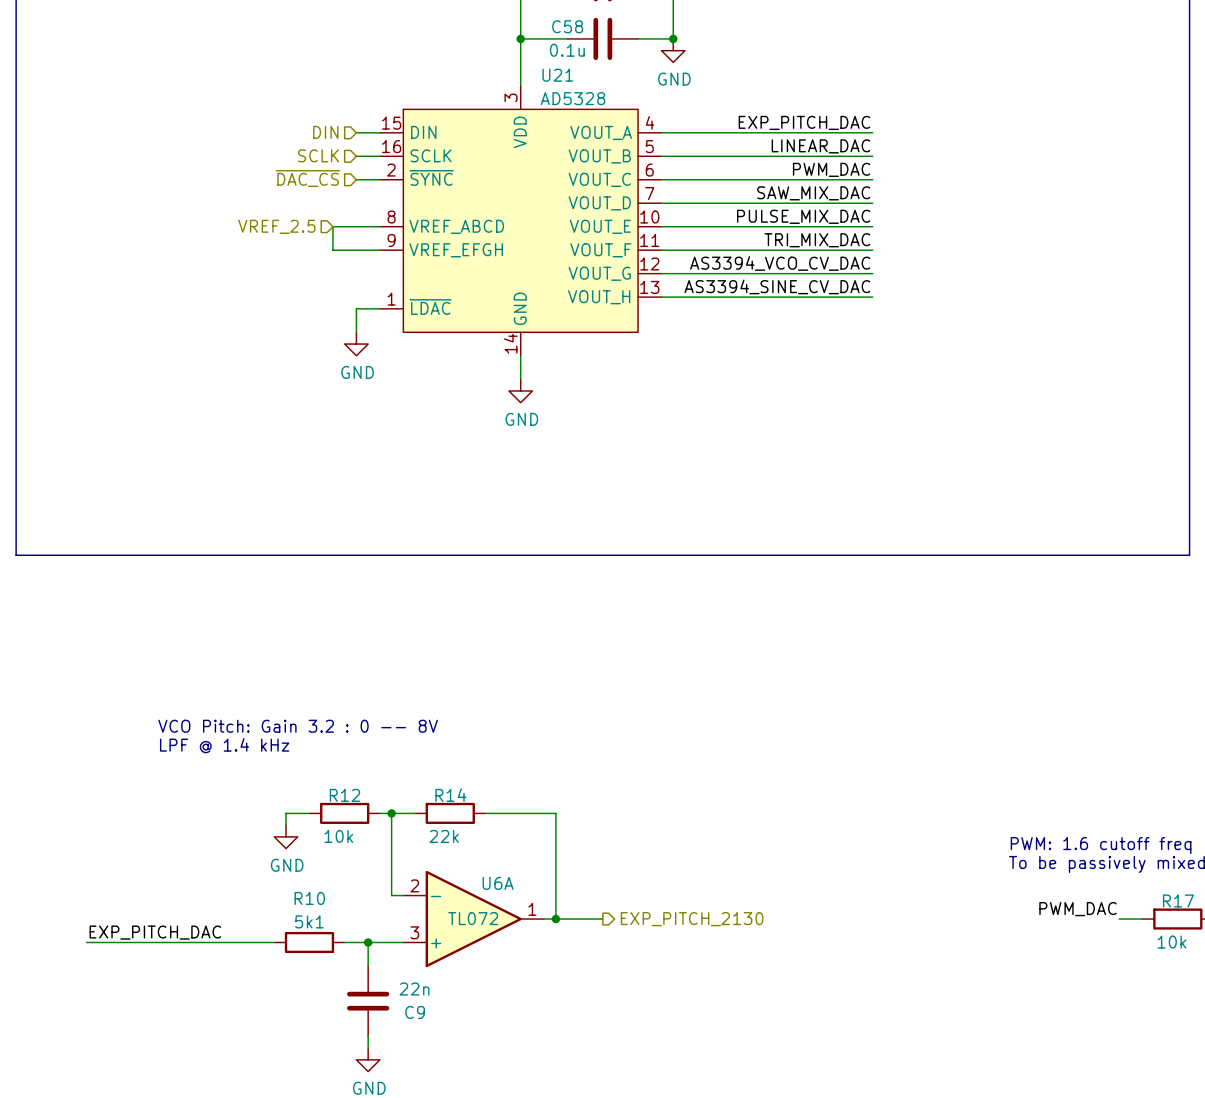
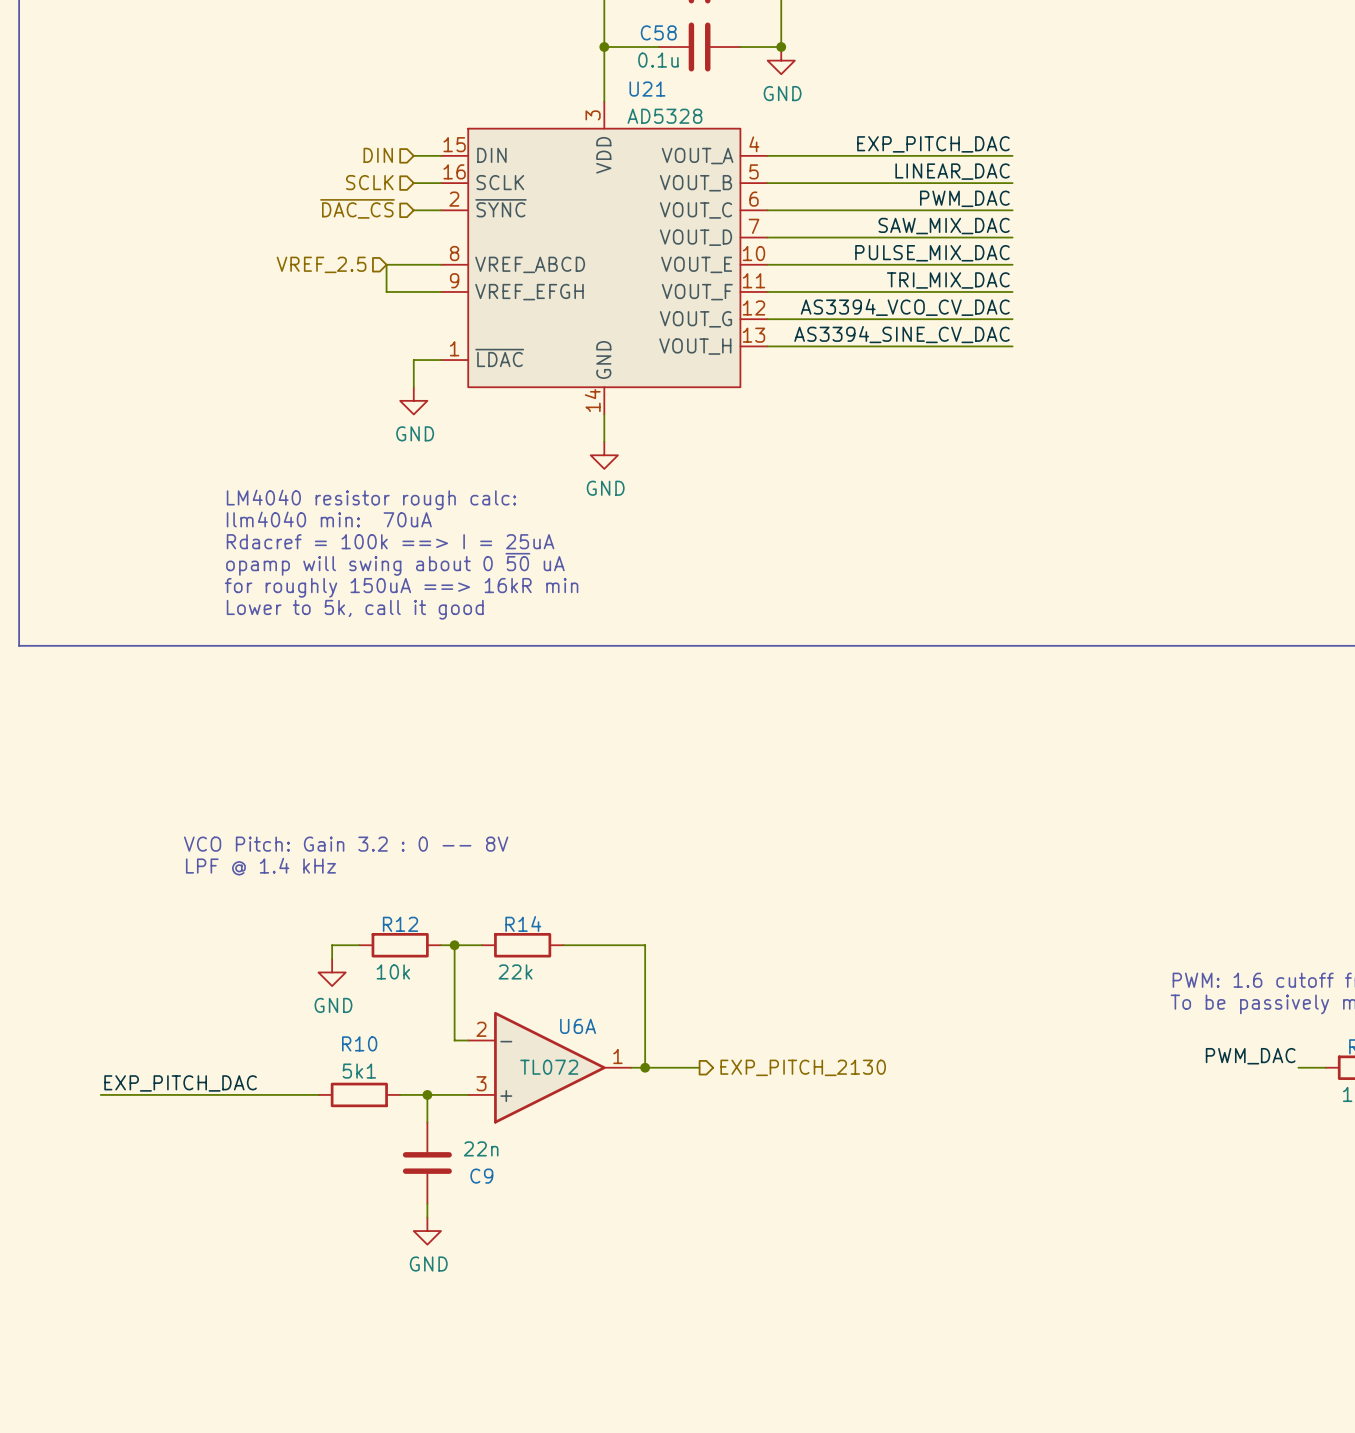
text: none -> LM4040 resistor rough calc: (371, 499)
text: none -> Ilm4040 min: 70uA (329, 519)
text: none -> Rdacref = 100k ==> I = 25uA (390, 541)
text: none -> opamp will swing about 0 ~{50} uA (395, 564)
text: none -> for roughly 150uA ==> 16kR min (401, 587)
text: none -> Lower to 5k, call it good (355, 609)

